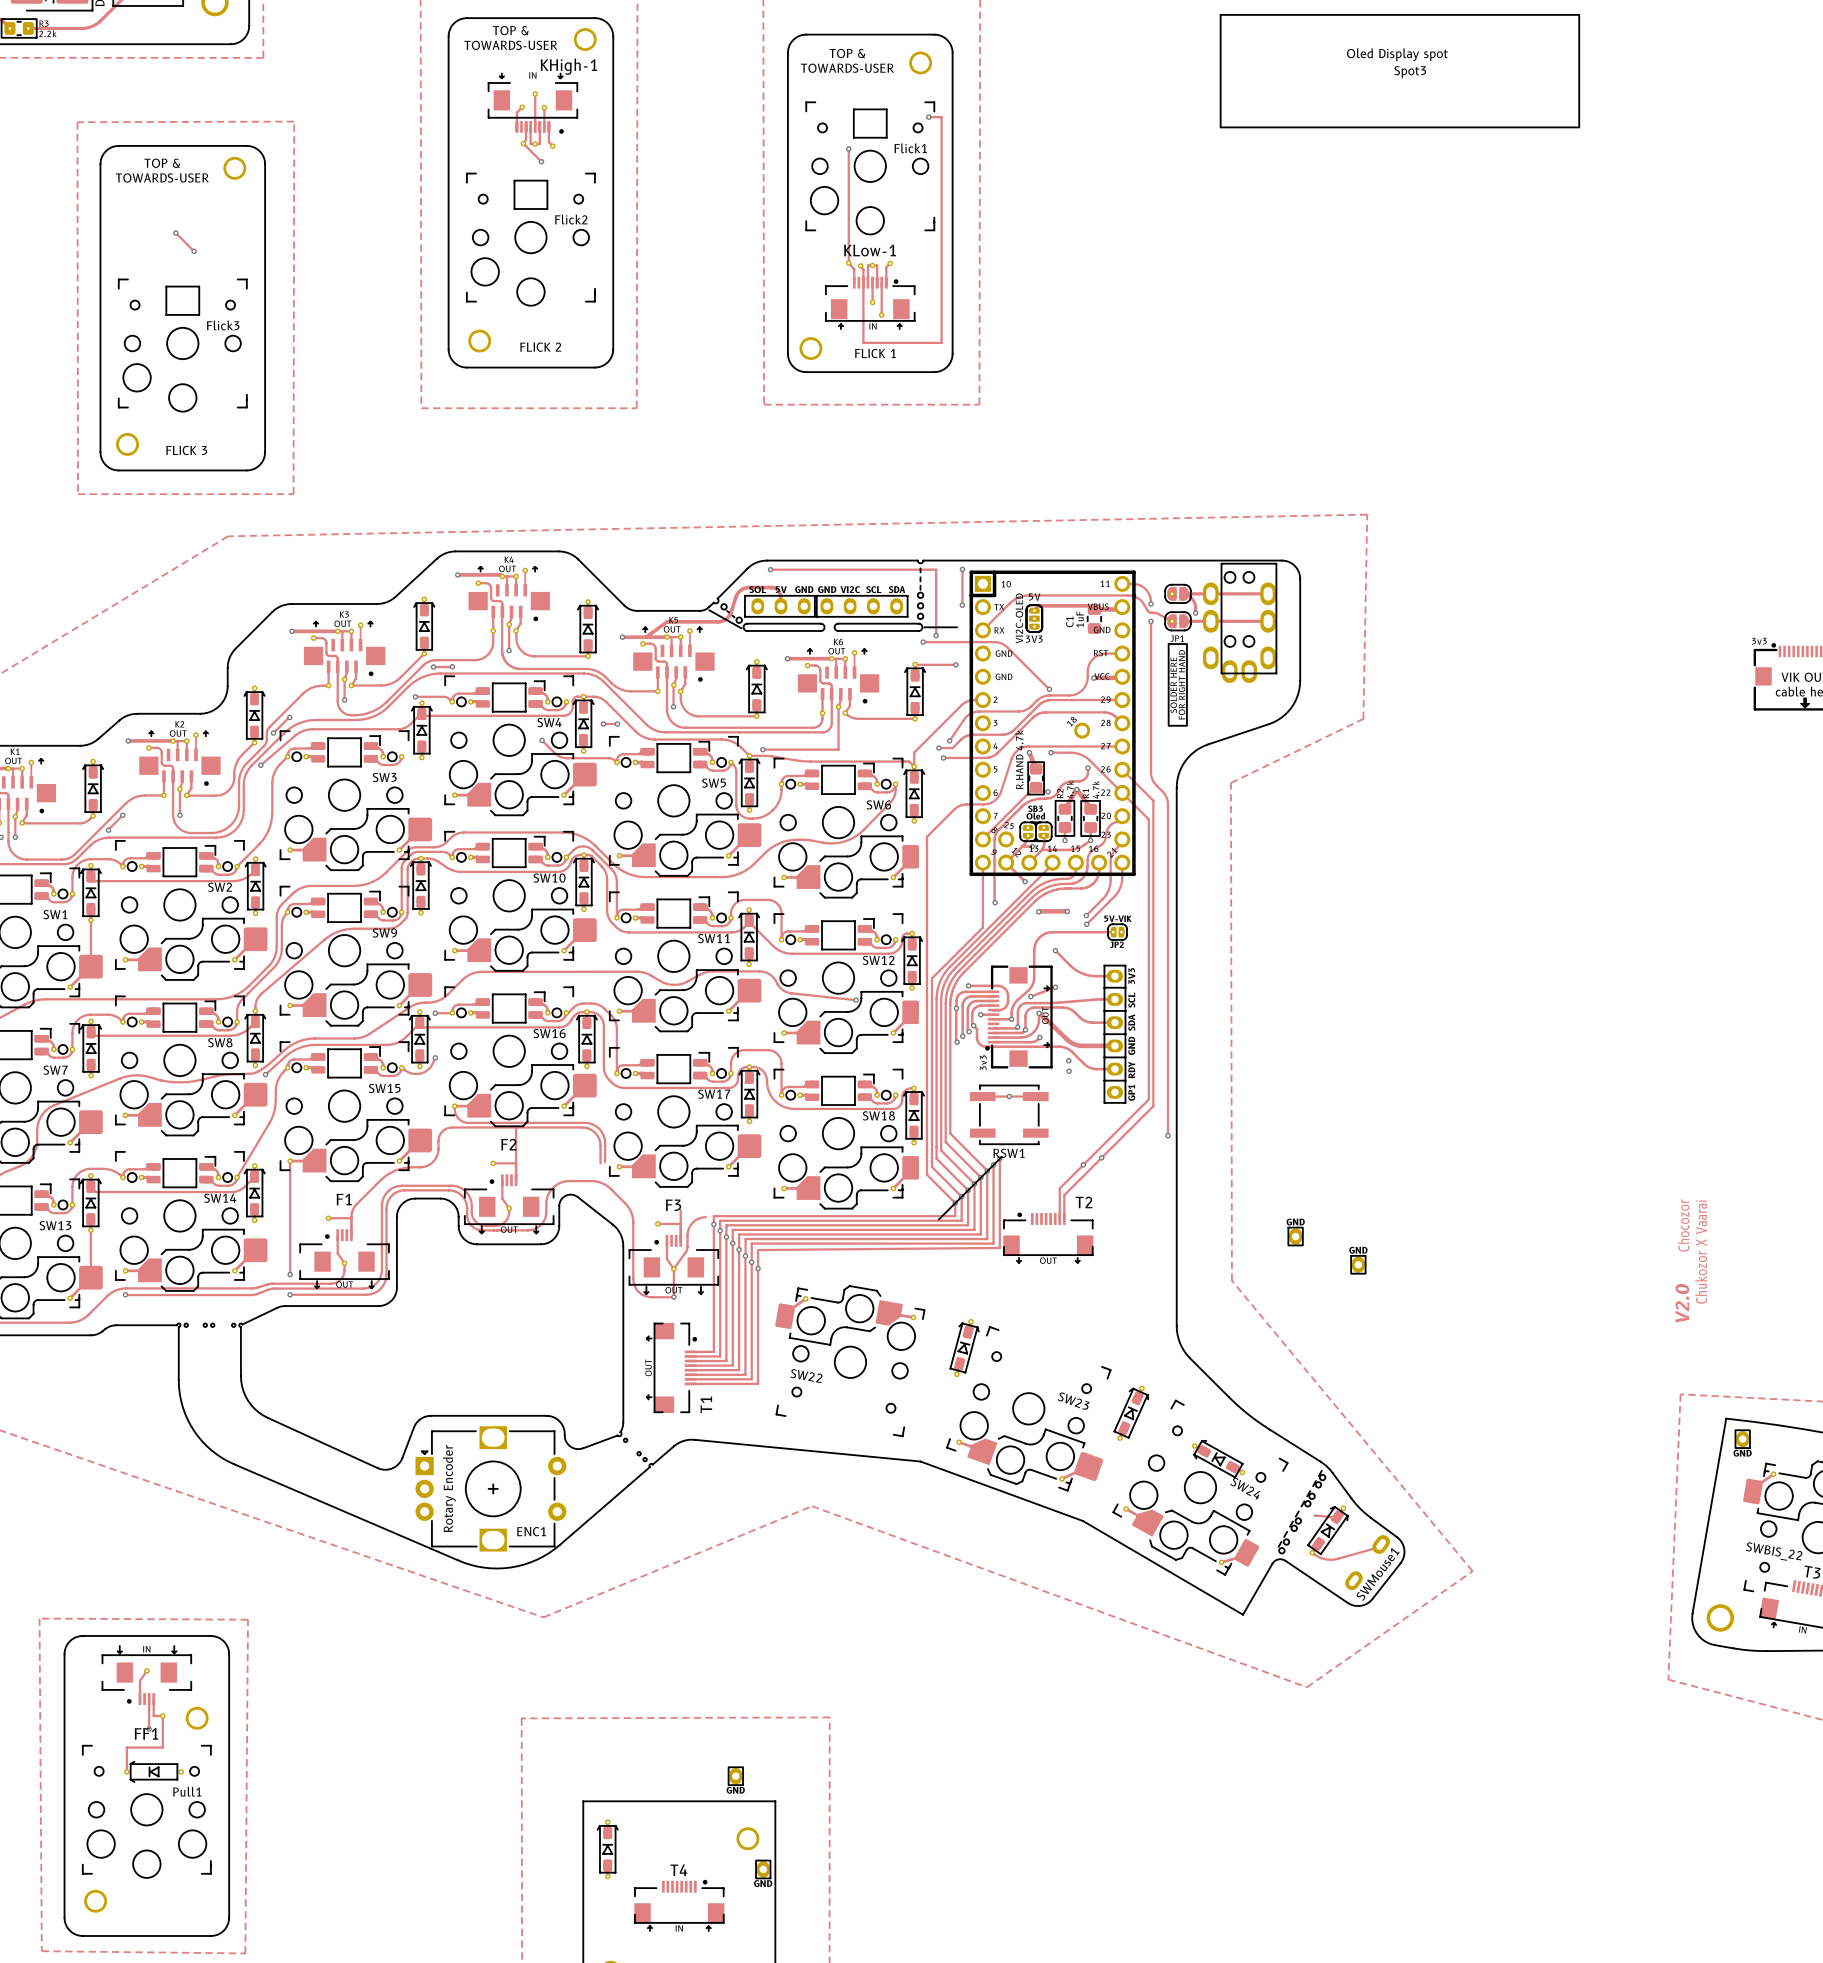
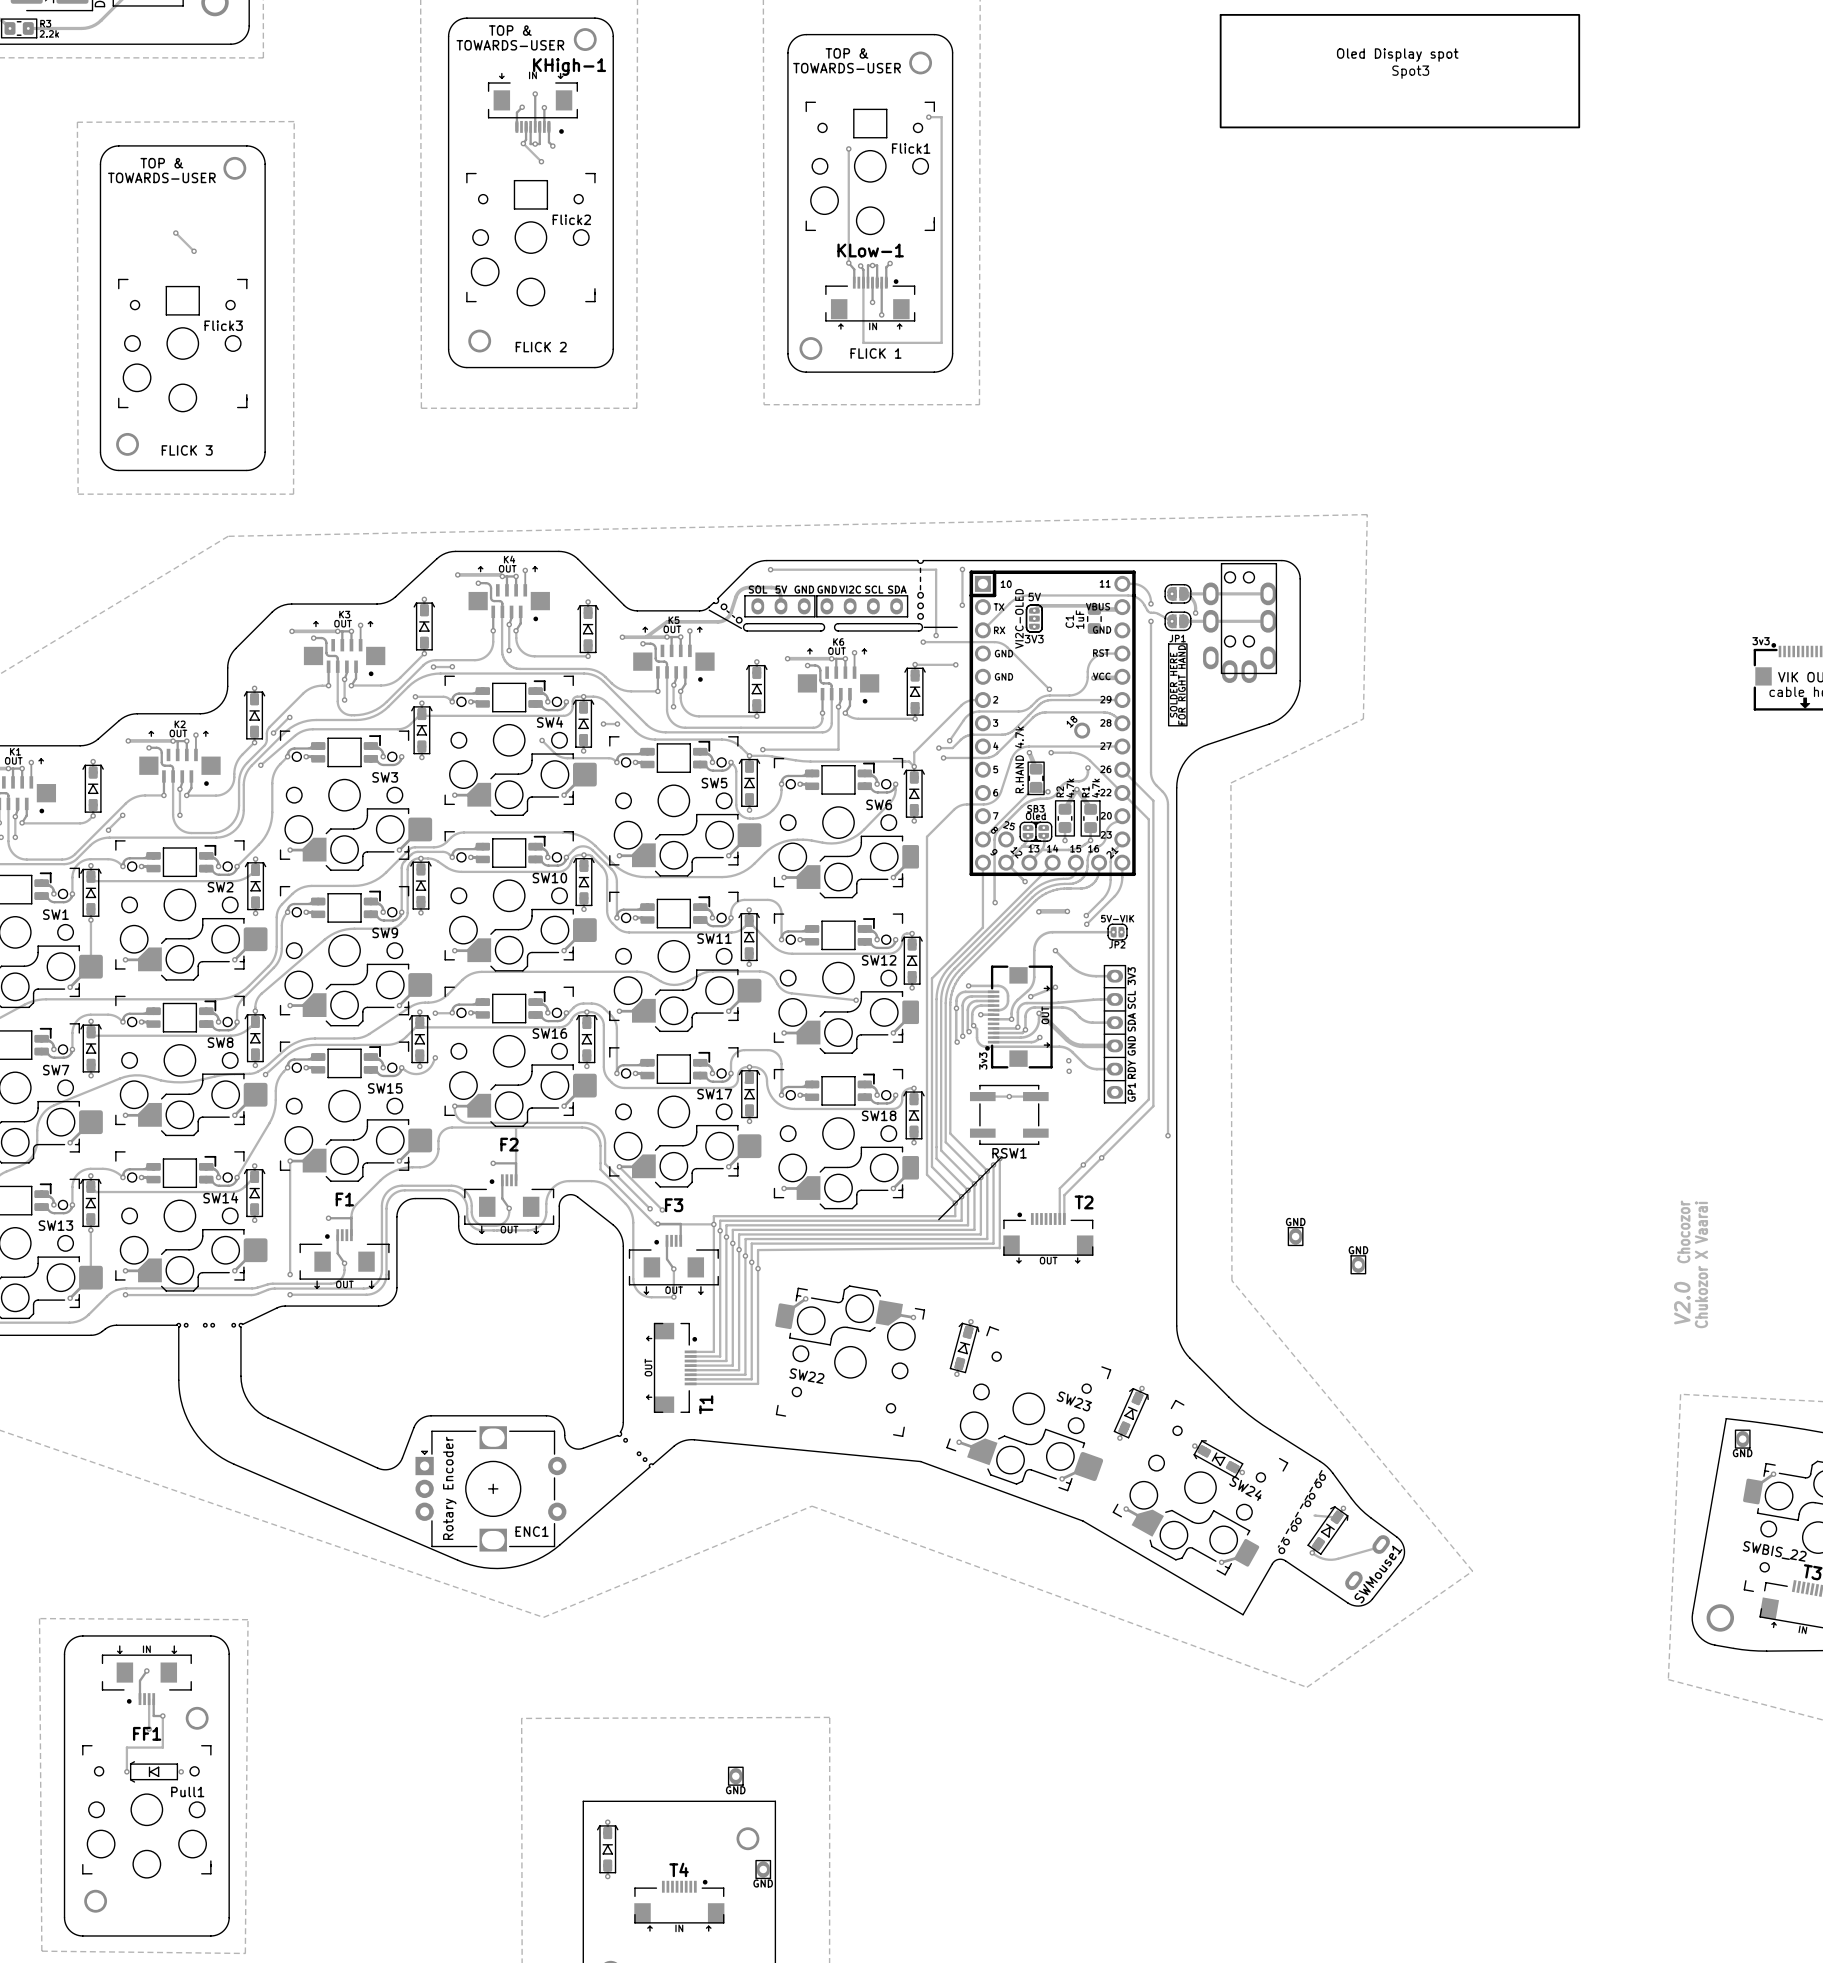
track: none -> (605, 1162) (650, 1208)
track: none -> (600, 1163) (600, 1169) (654, 1223) (713, 1224)
track: none -> (619, 1166) (662, 1209)
via: none -> (650, 1208)
via: none -> (662, 1209)
track: (680, 1210) (680, 1240) -> none
track: (705, 1217) (696, 1220) (690, 1225) (687, 1233) (686, 1250) (673, 1268) -> none

